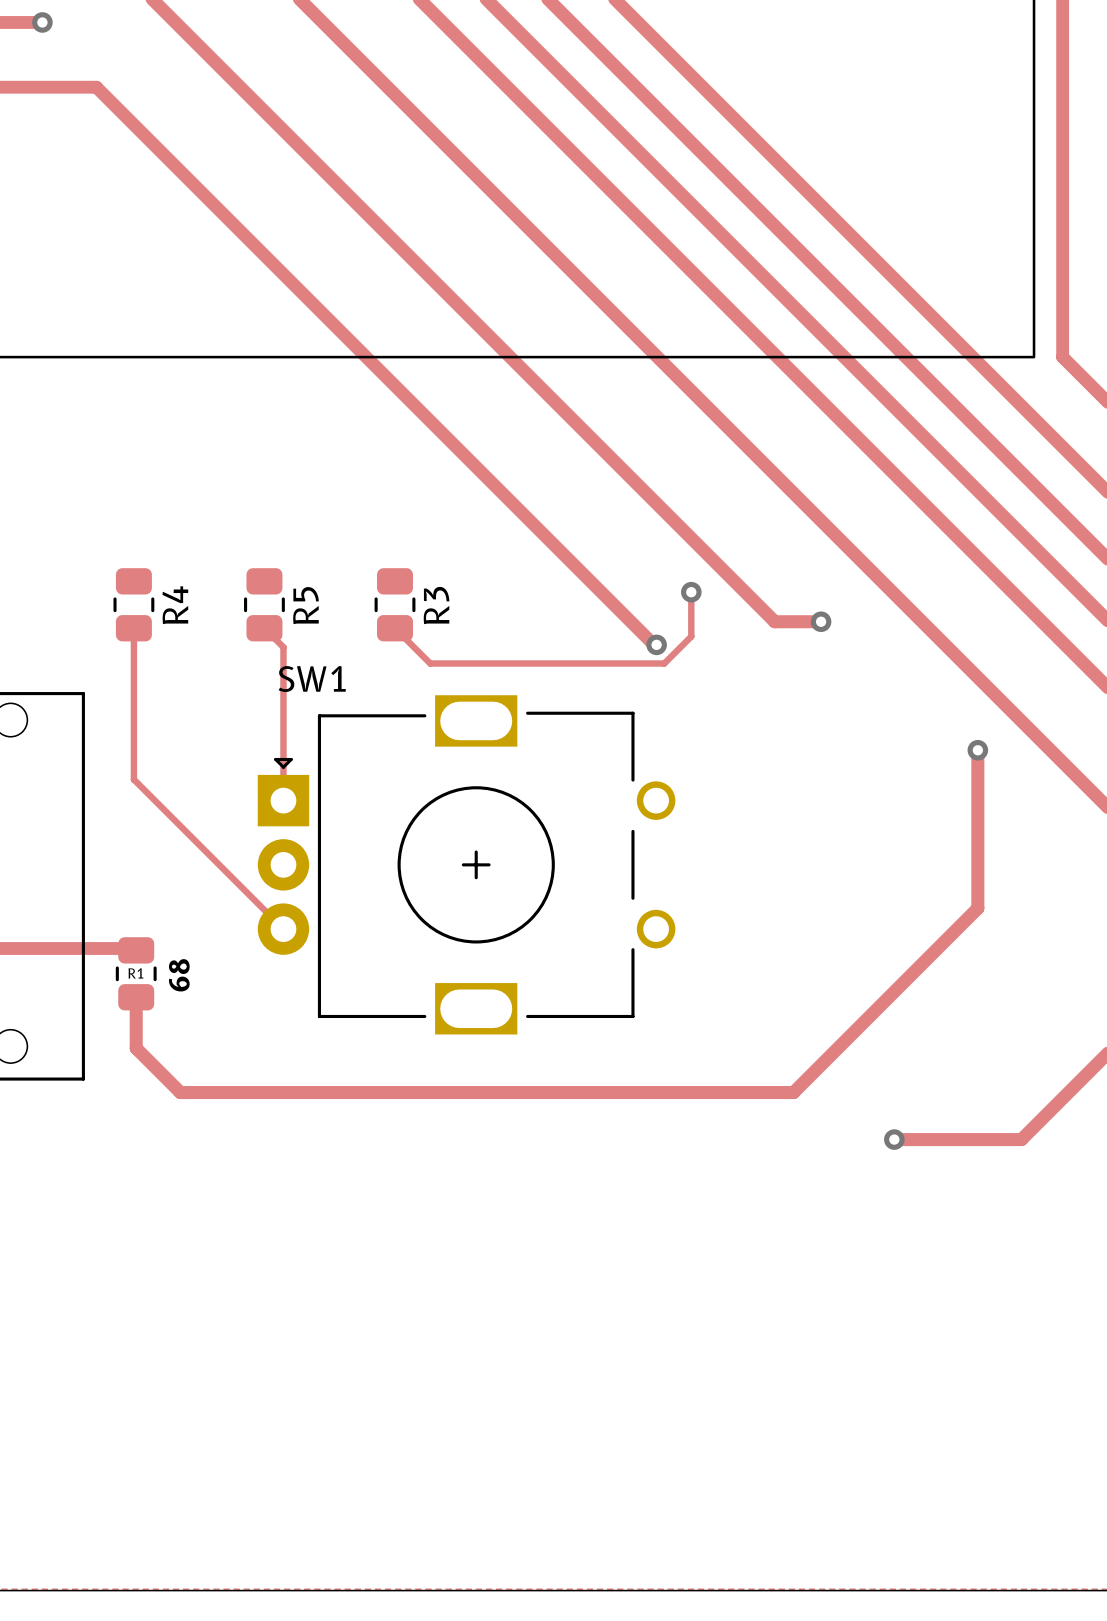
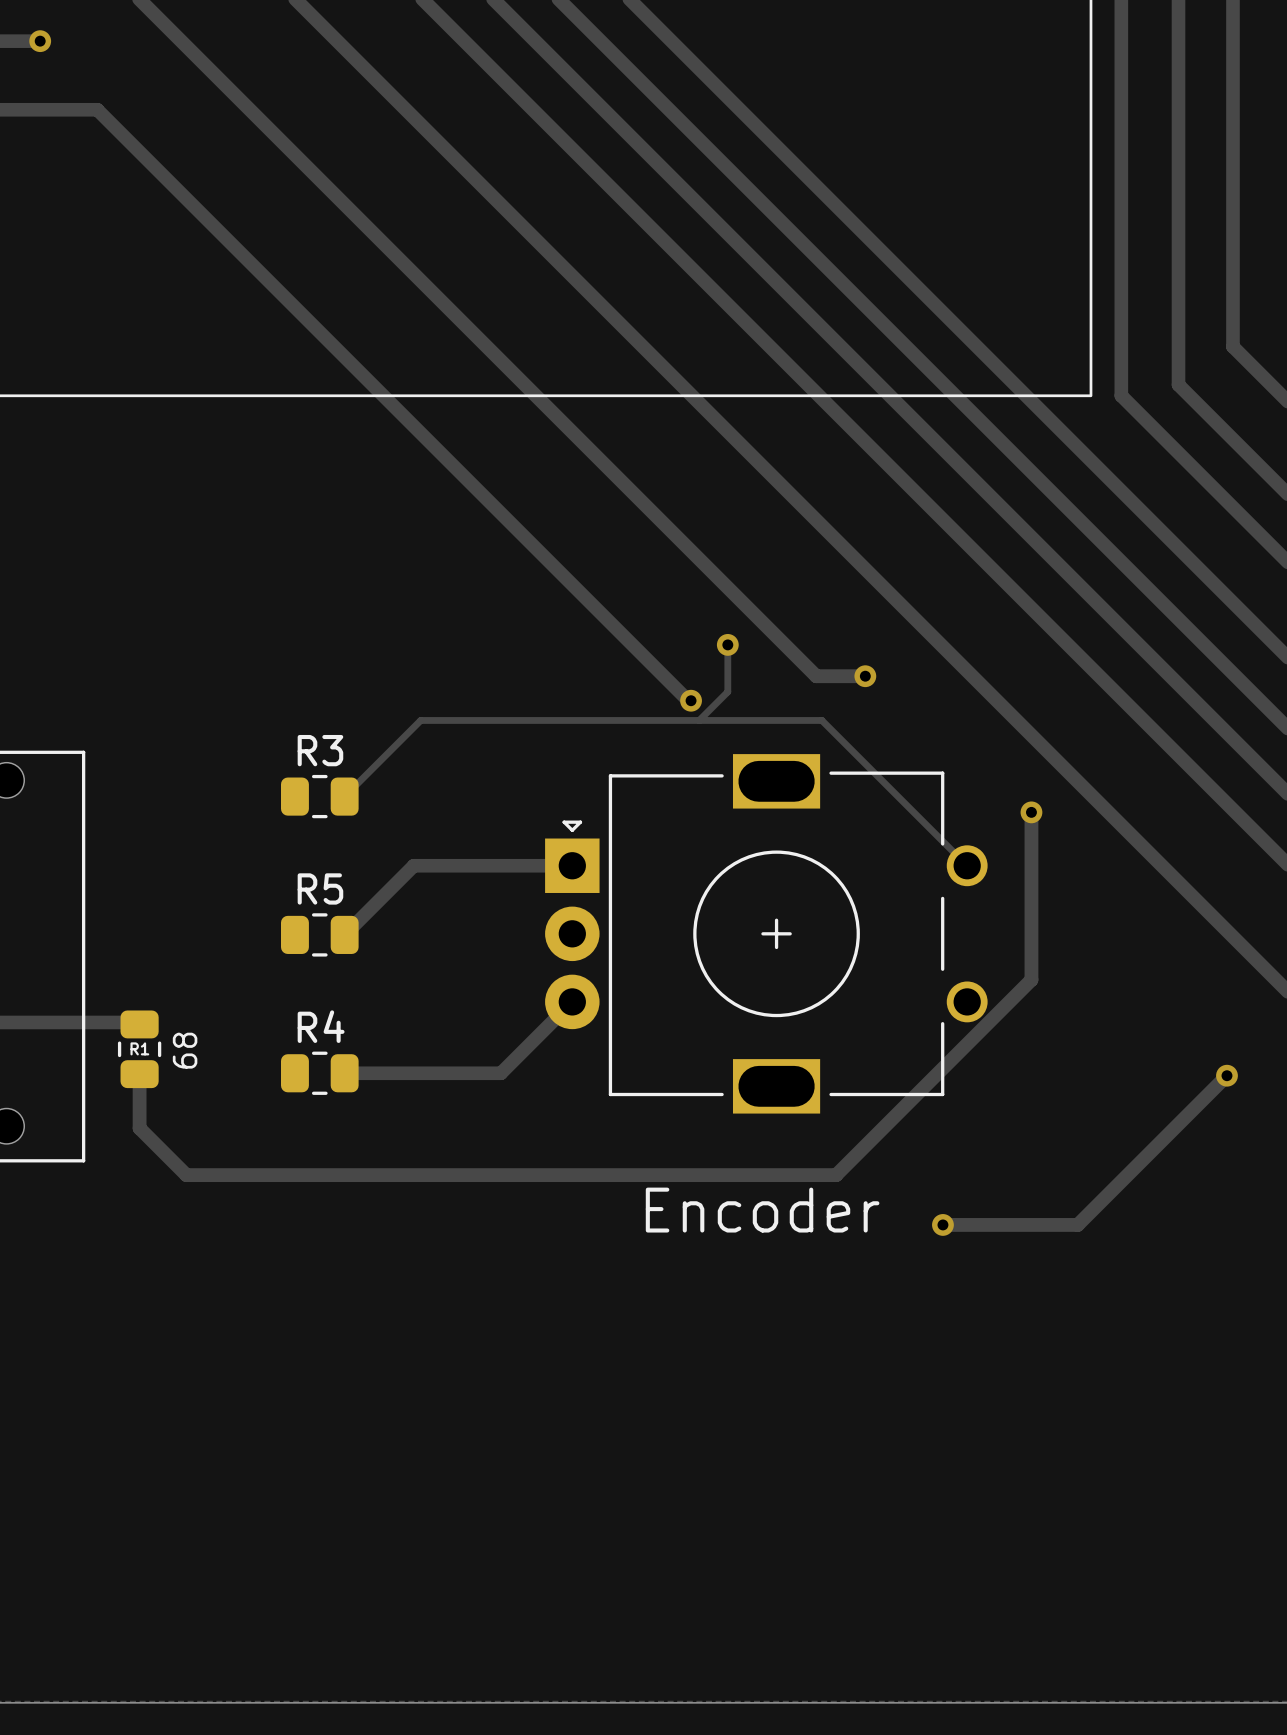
R4 rotation: 0° (133, 604) -> 90° clockwise (319, 1073)
R4 position: (133, 604) -> (319, 1073)
R5 rotation: 0° (264, 604) -> 90° clockwise (319, 934)
R5 position: (264, 604) -> (319, 934)
R3 rotation: 0° (395, 604) -> 90° clockwise (319, 796)
R3 position: (395, 604) -> (319, 796)
R4 name position: R4 (175, 605) -> R4 (321, 1026)
R5 name position: R5 (305, 605) -> R5 (320, 888)
R3 name position: R3 (436, 605) -> R3 (320, 750)
track: (133, 628) (133, 779) (283, 929) -> none
track: (264, 628) (283, 647) (283, 800) -> none
track: (395, 628) (430, 663) -> (344, 796) (420, 720) (451, 720)
track: none -> (699, 720) (821, 720) (967, 865)
track: none -> (572, 865) (413, 865) (344, 934)
SW1: (466, 864) -> none
Encoder: none -> (766, 933)
track: none -> (572, 1001) (500, 1073) (344, 1073)

